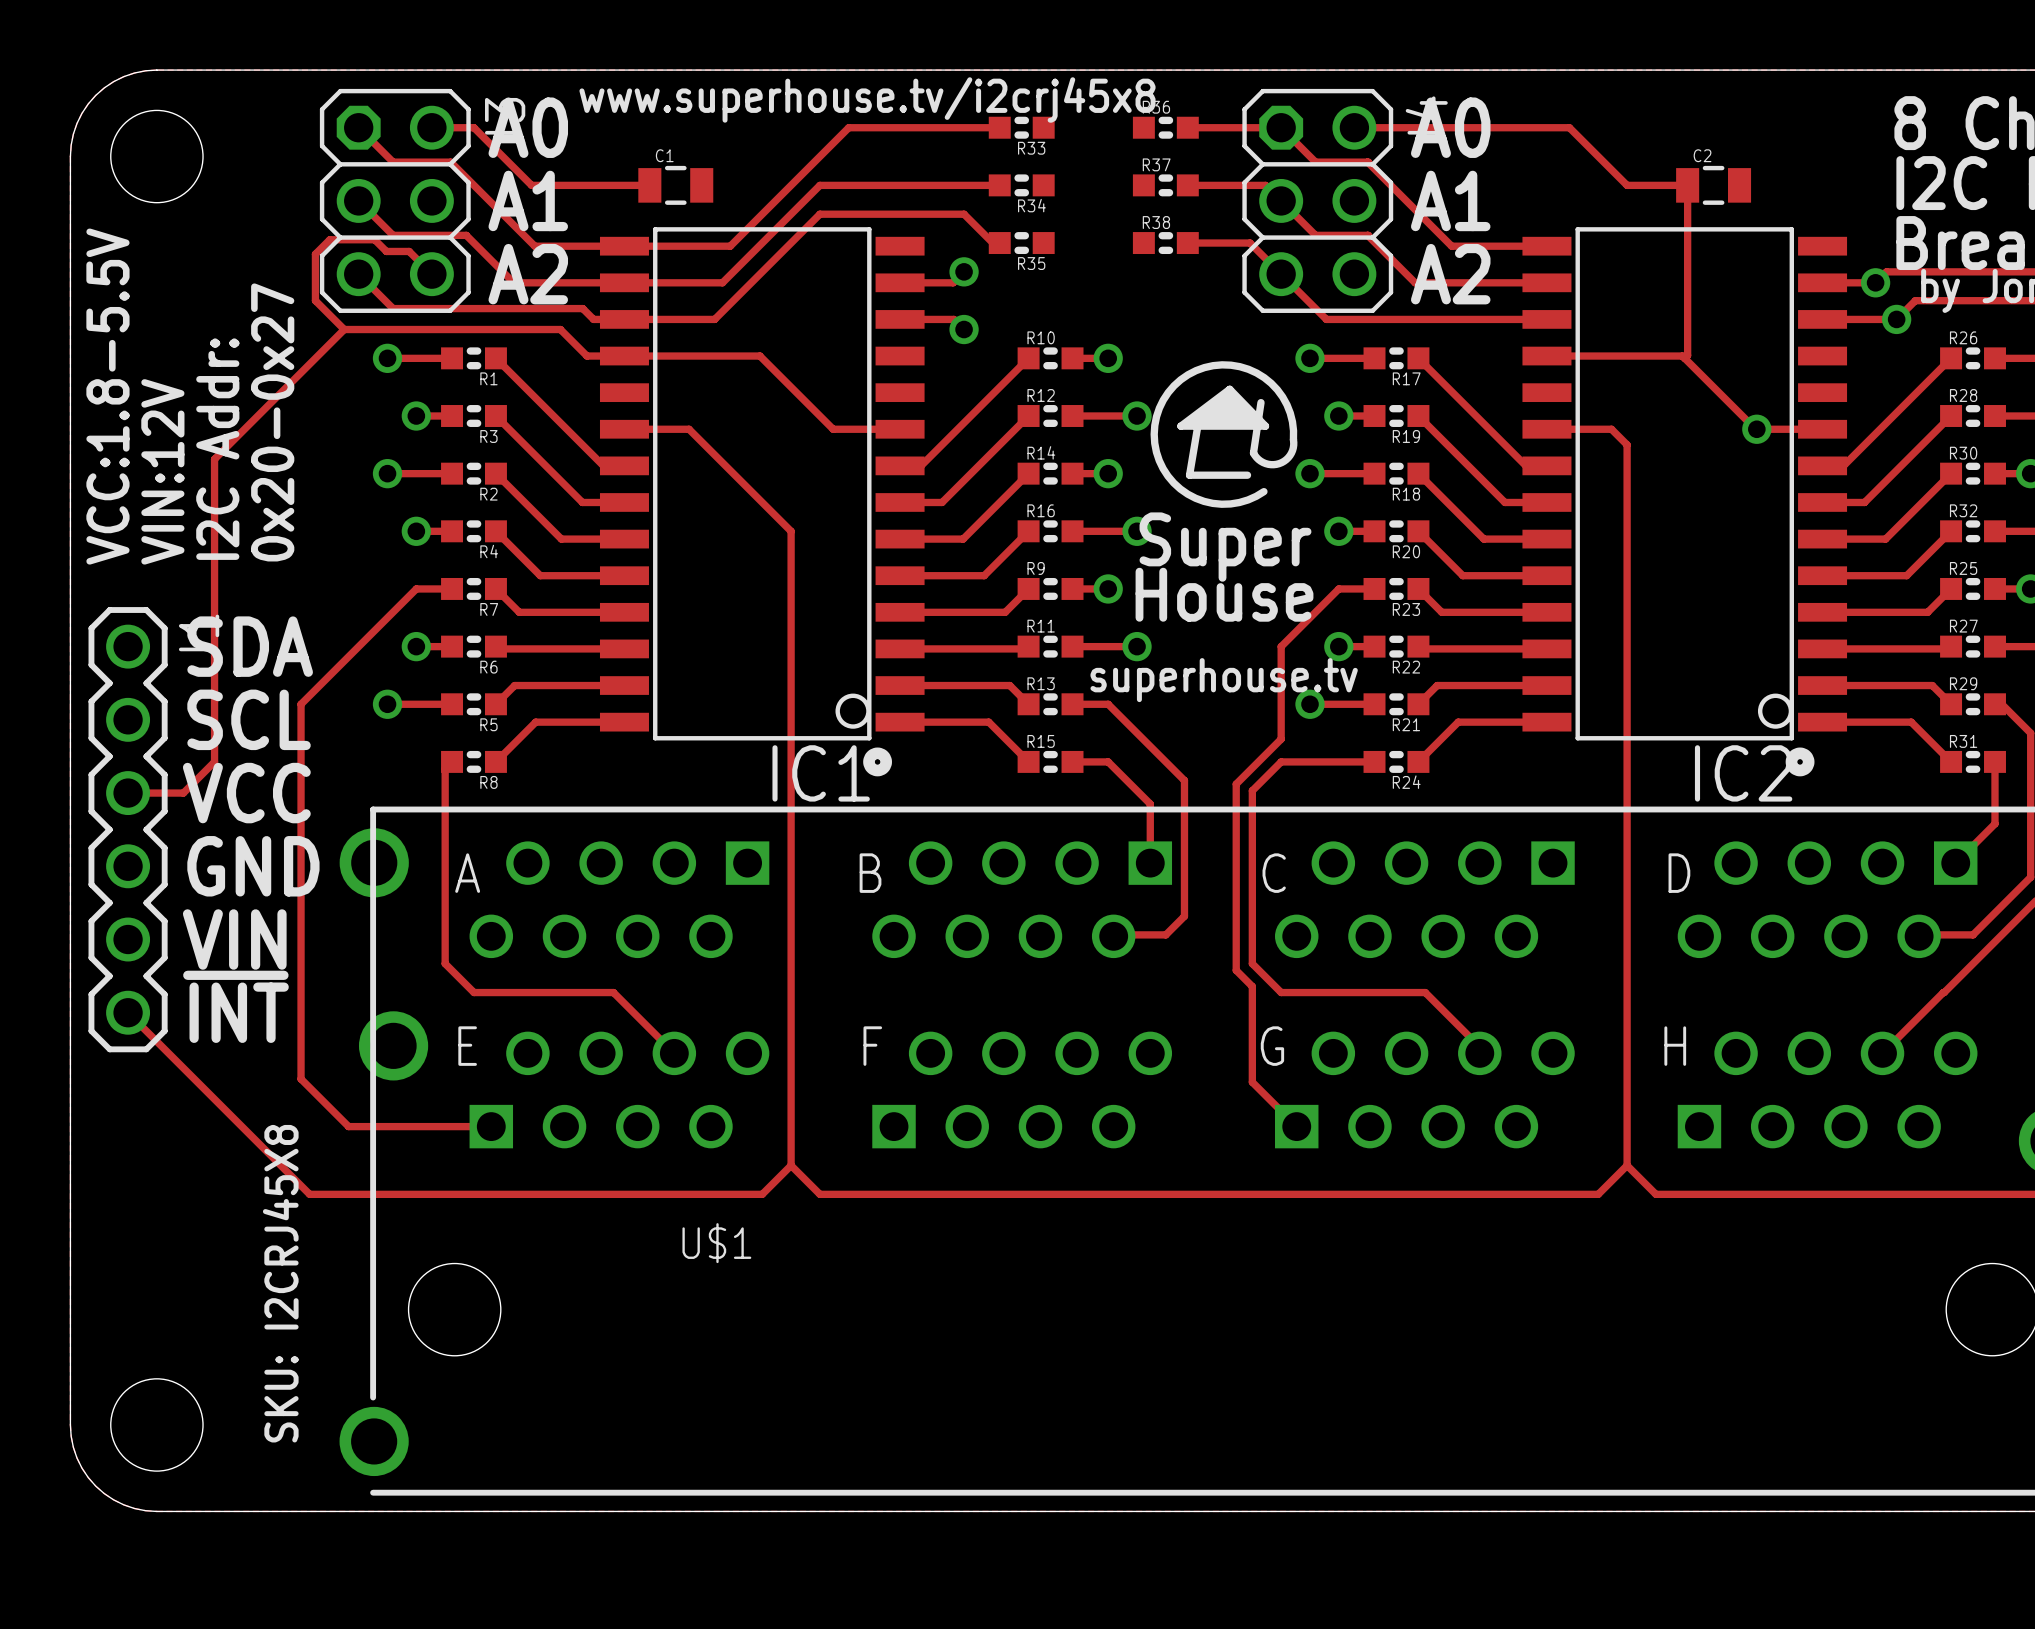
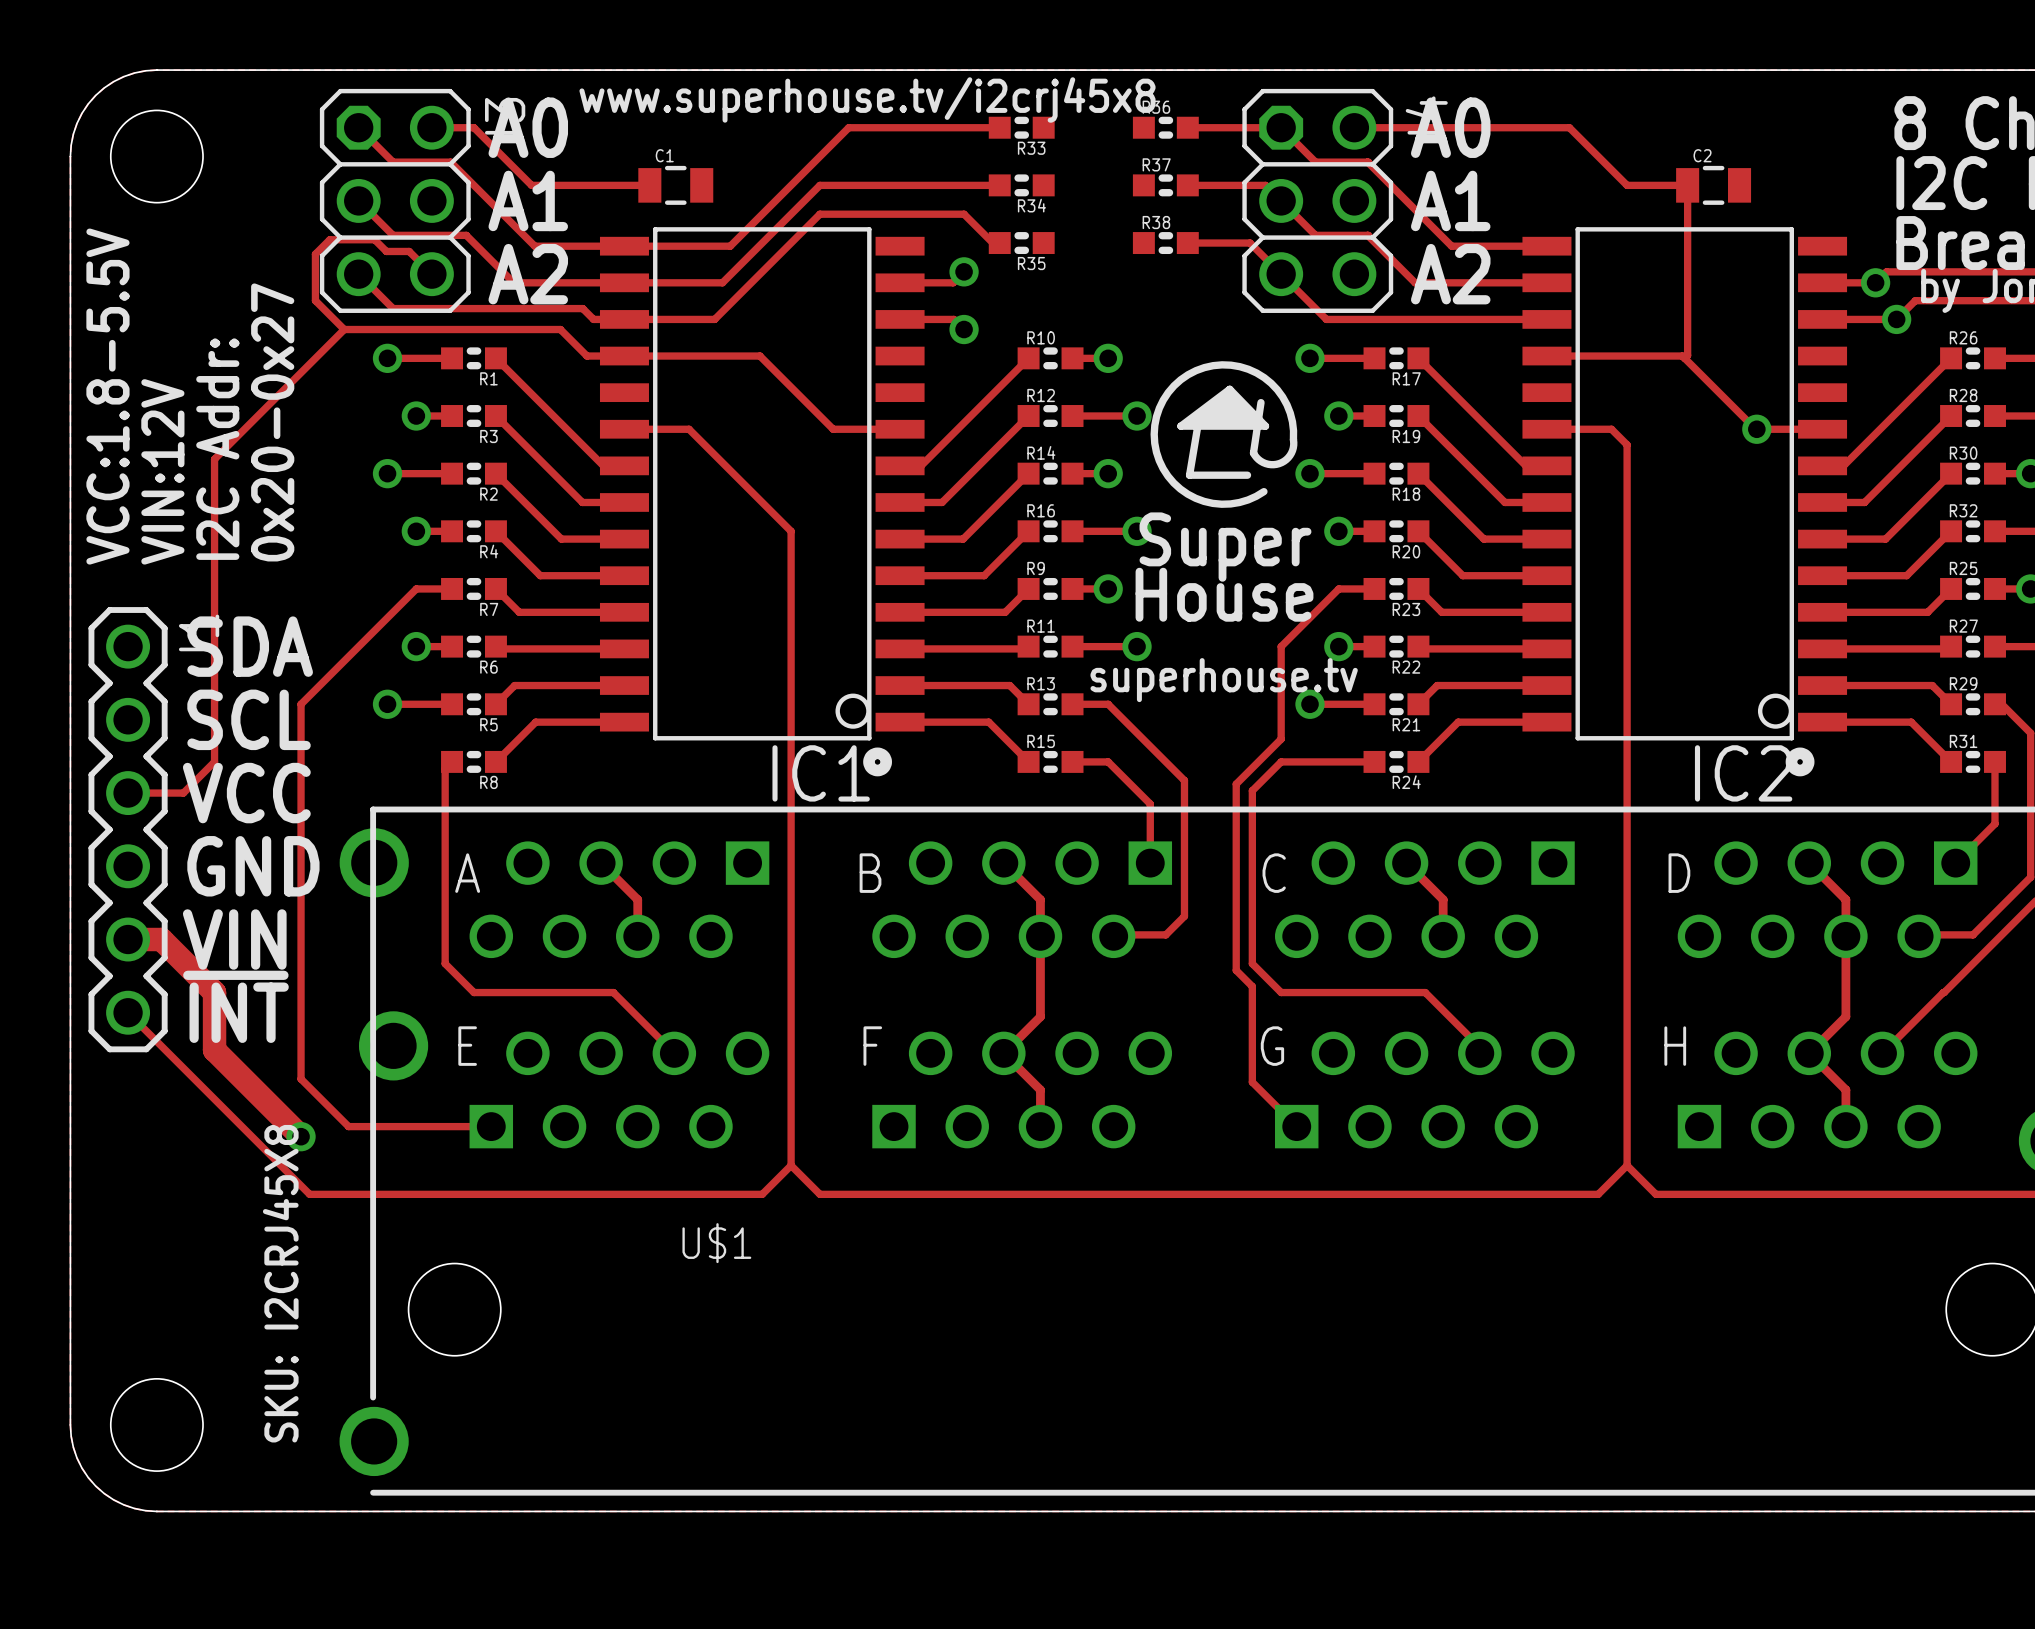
track: none -> (601, 863) (637, 899) (637, 936)
track: none -> (1003, 863) (1040, 899) (1040, 1016) (1003, 1053) (1040, 1089) (1040, 1126)
track: none -> (1406, 863) (1443, 899) (1443, 936)
track: none -> (1809, 863) (1845, 899) (1845, 1016) (1809, 1053) (1845, 1089) (1845, 1126)
track: none -> (128, 939) (161, 939) (214, 992) (214, 1050) (301, 1136)
via: none -> (301, 1136)

